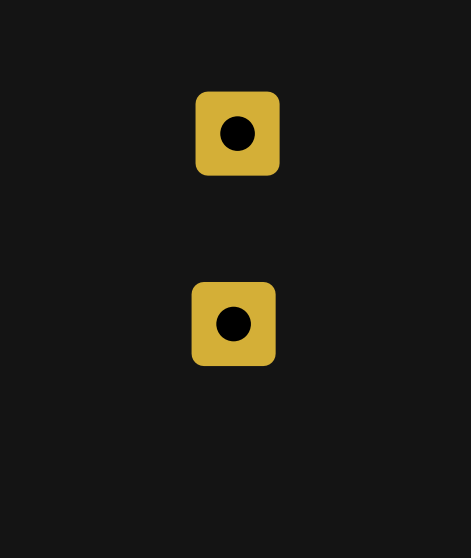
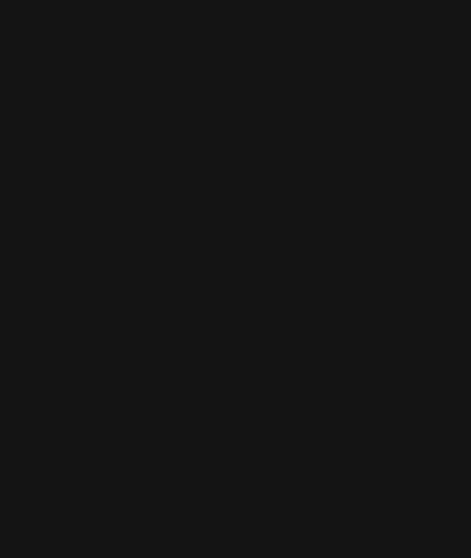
part: (237, 133) -> none
part: (233, 324) -> none

